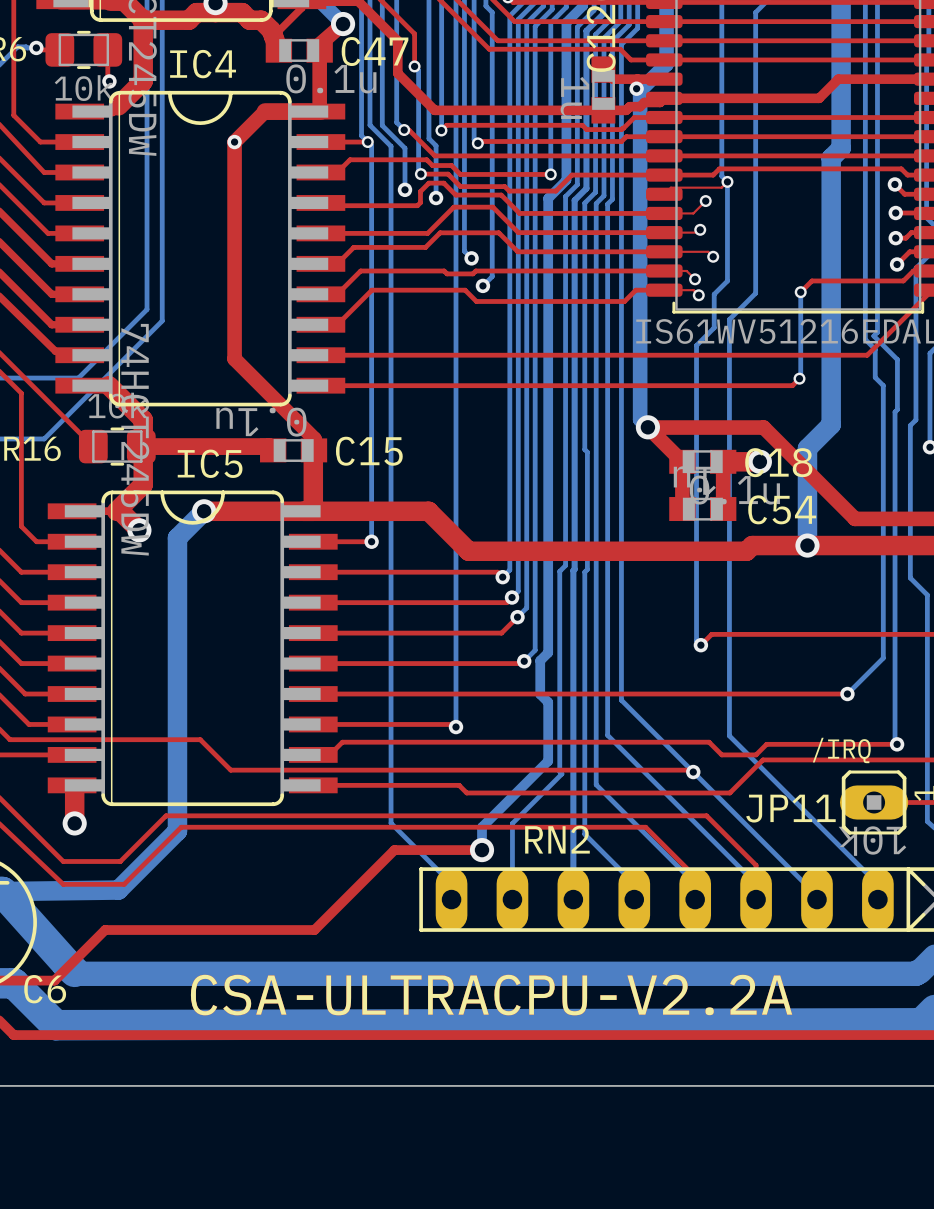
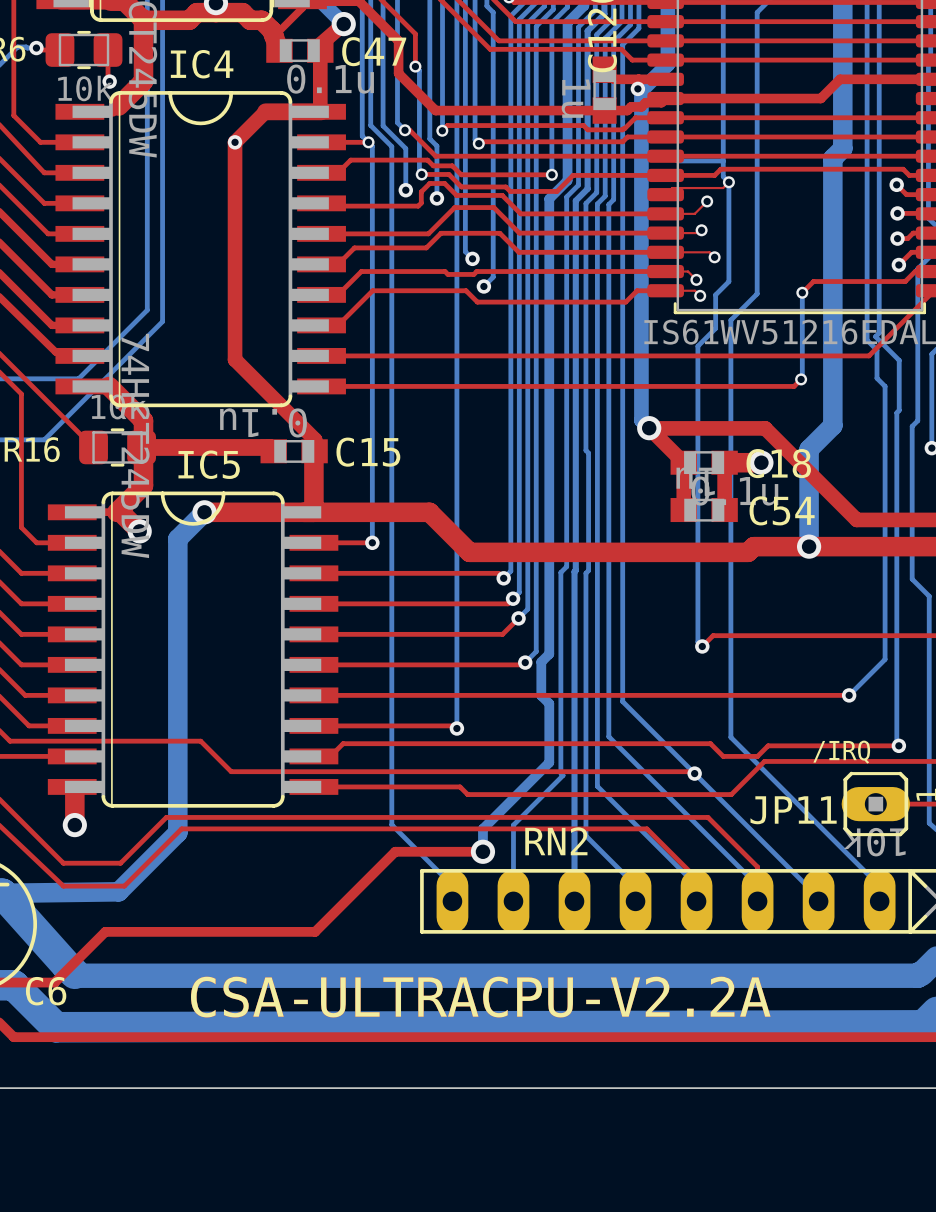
bottom track: none -> (677, 160) (722, 160)

